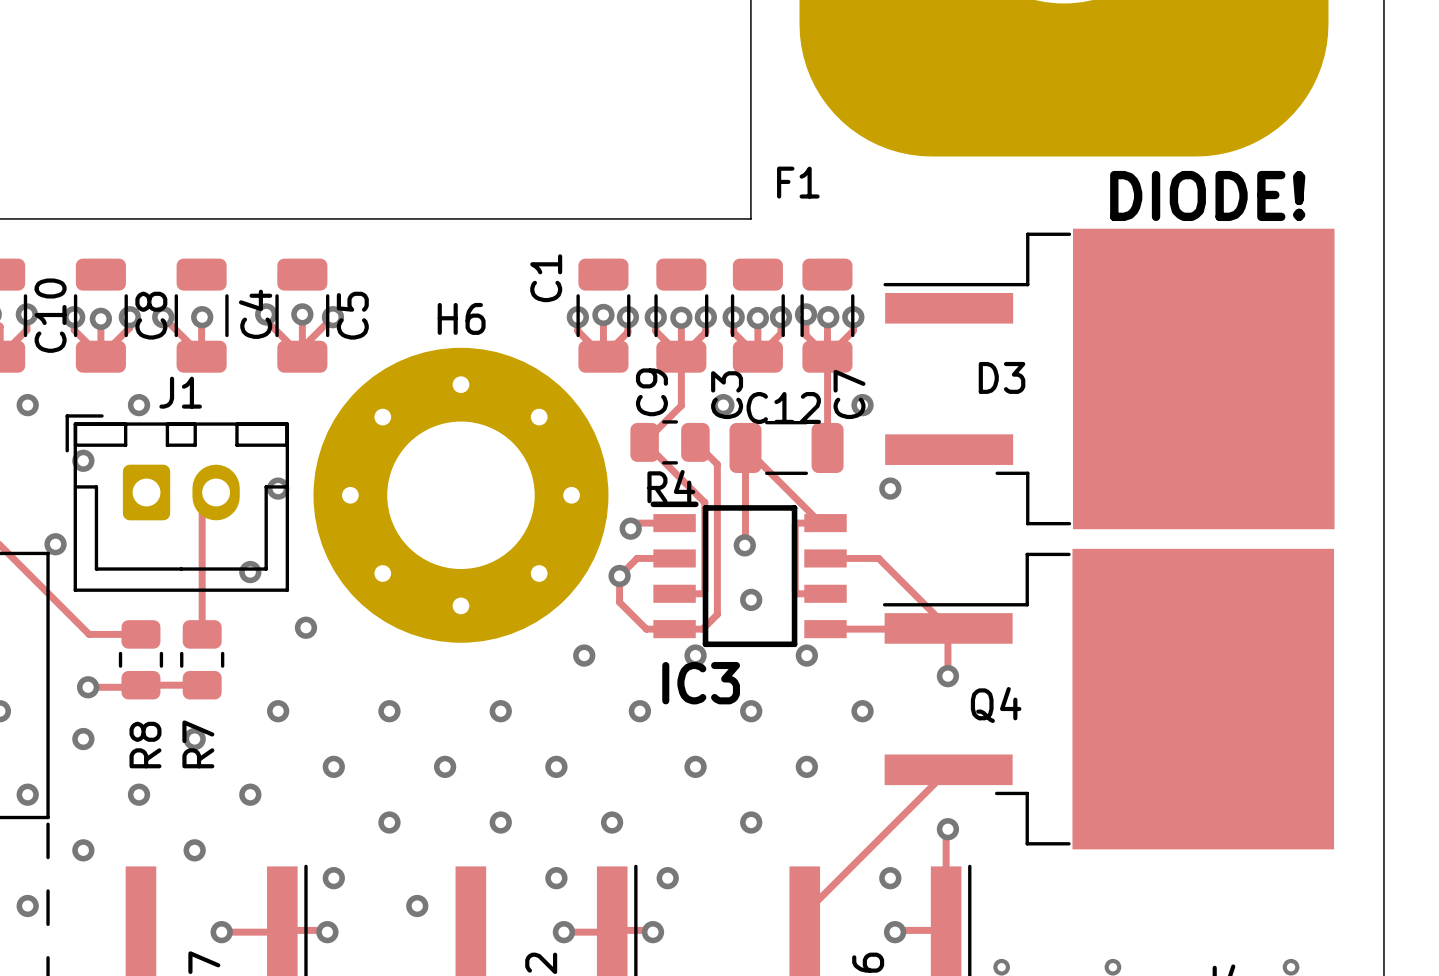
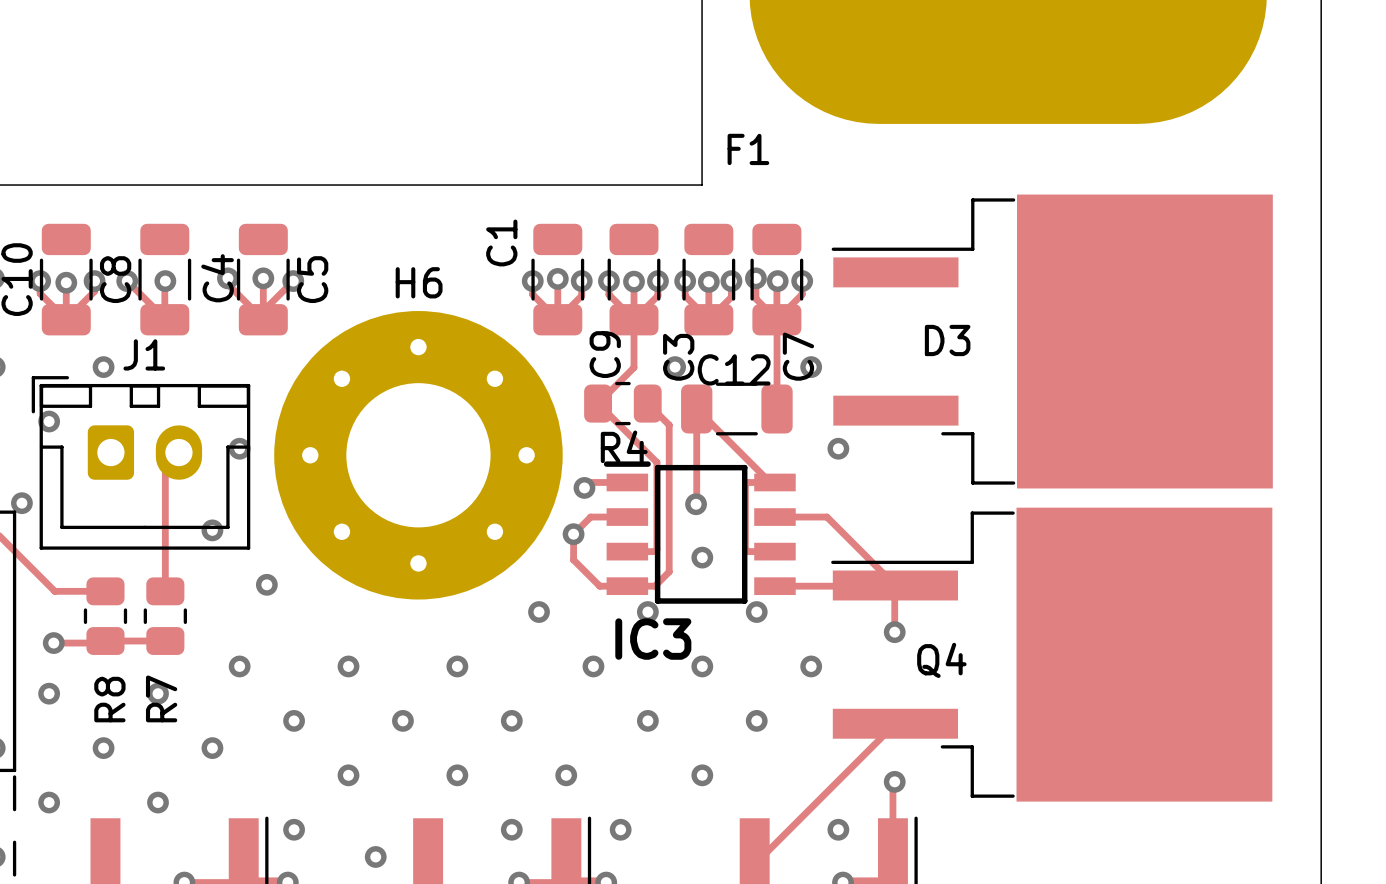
text: DIODE! (1207, 195) -> none

